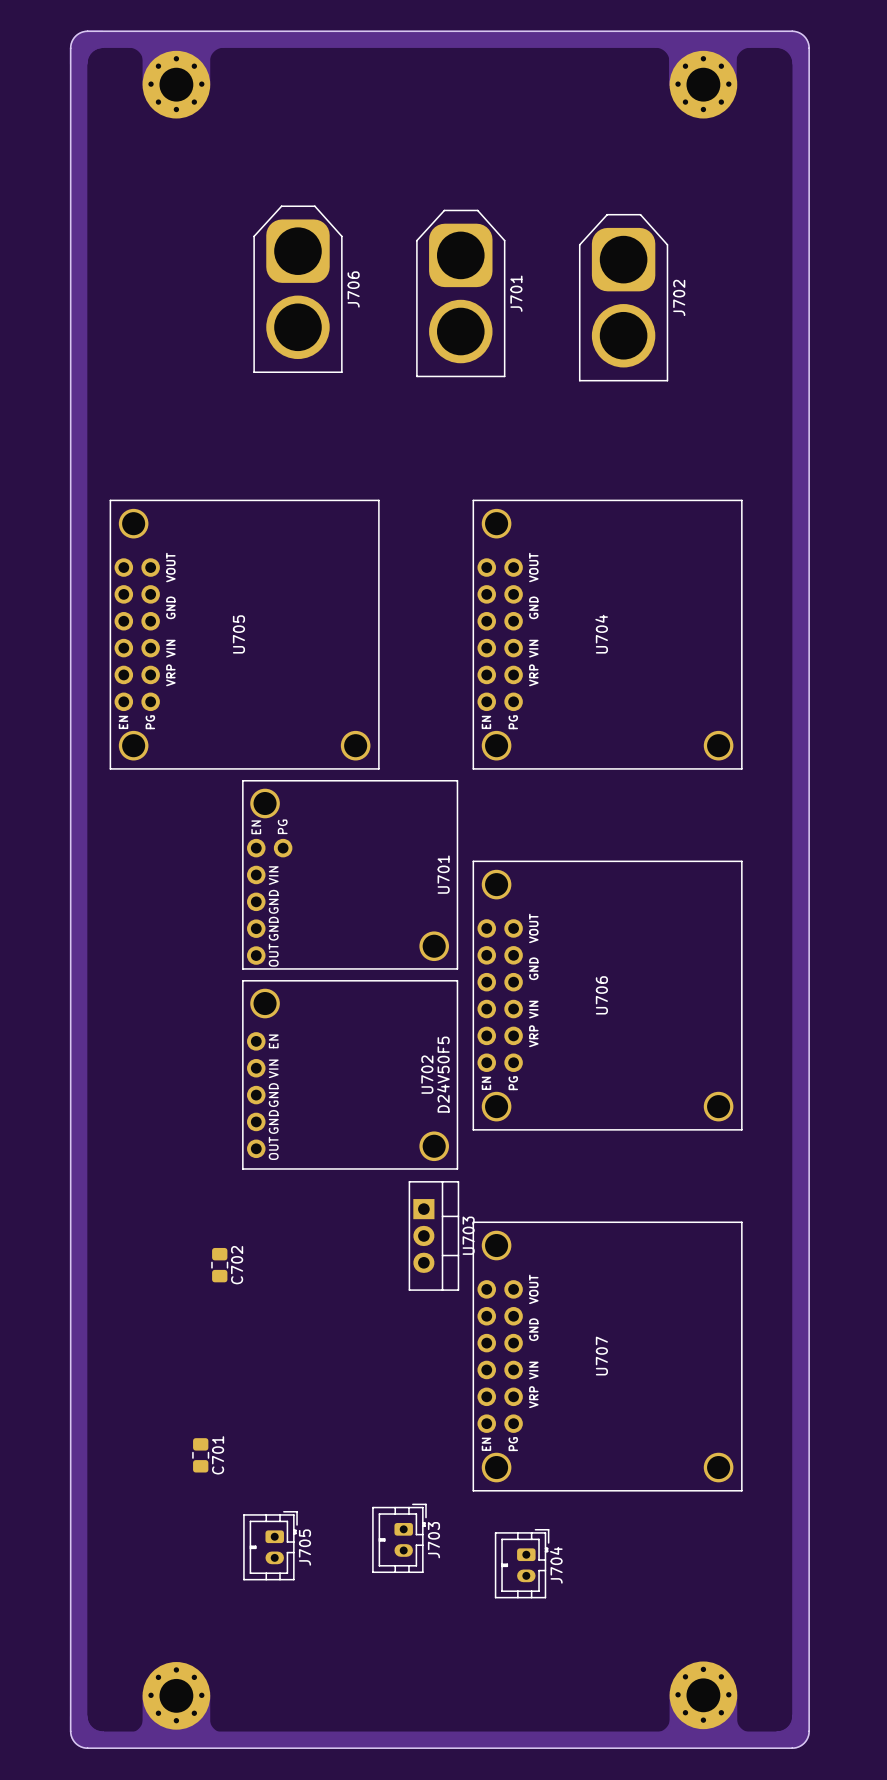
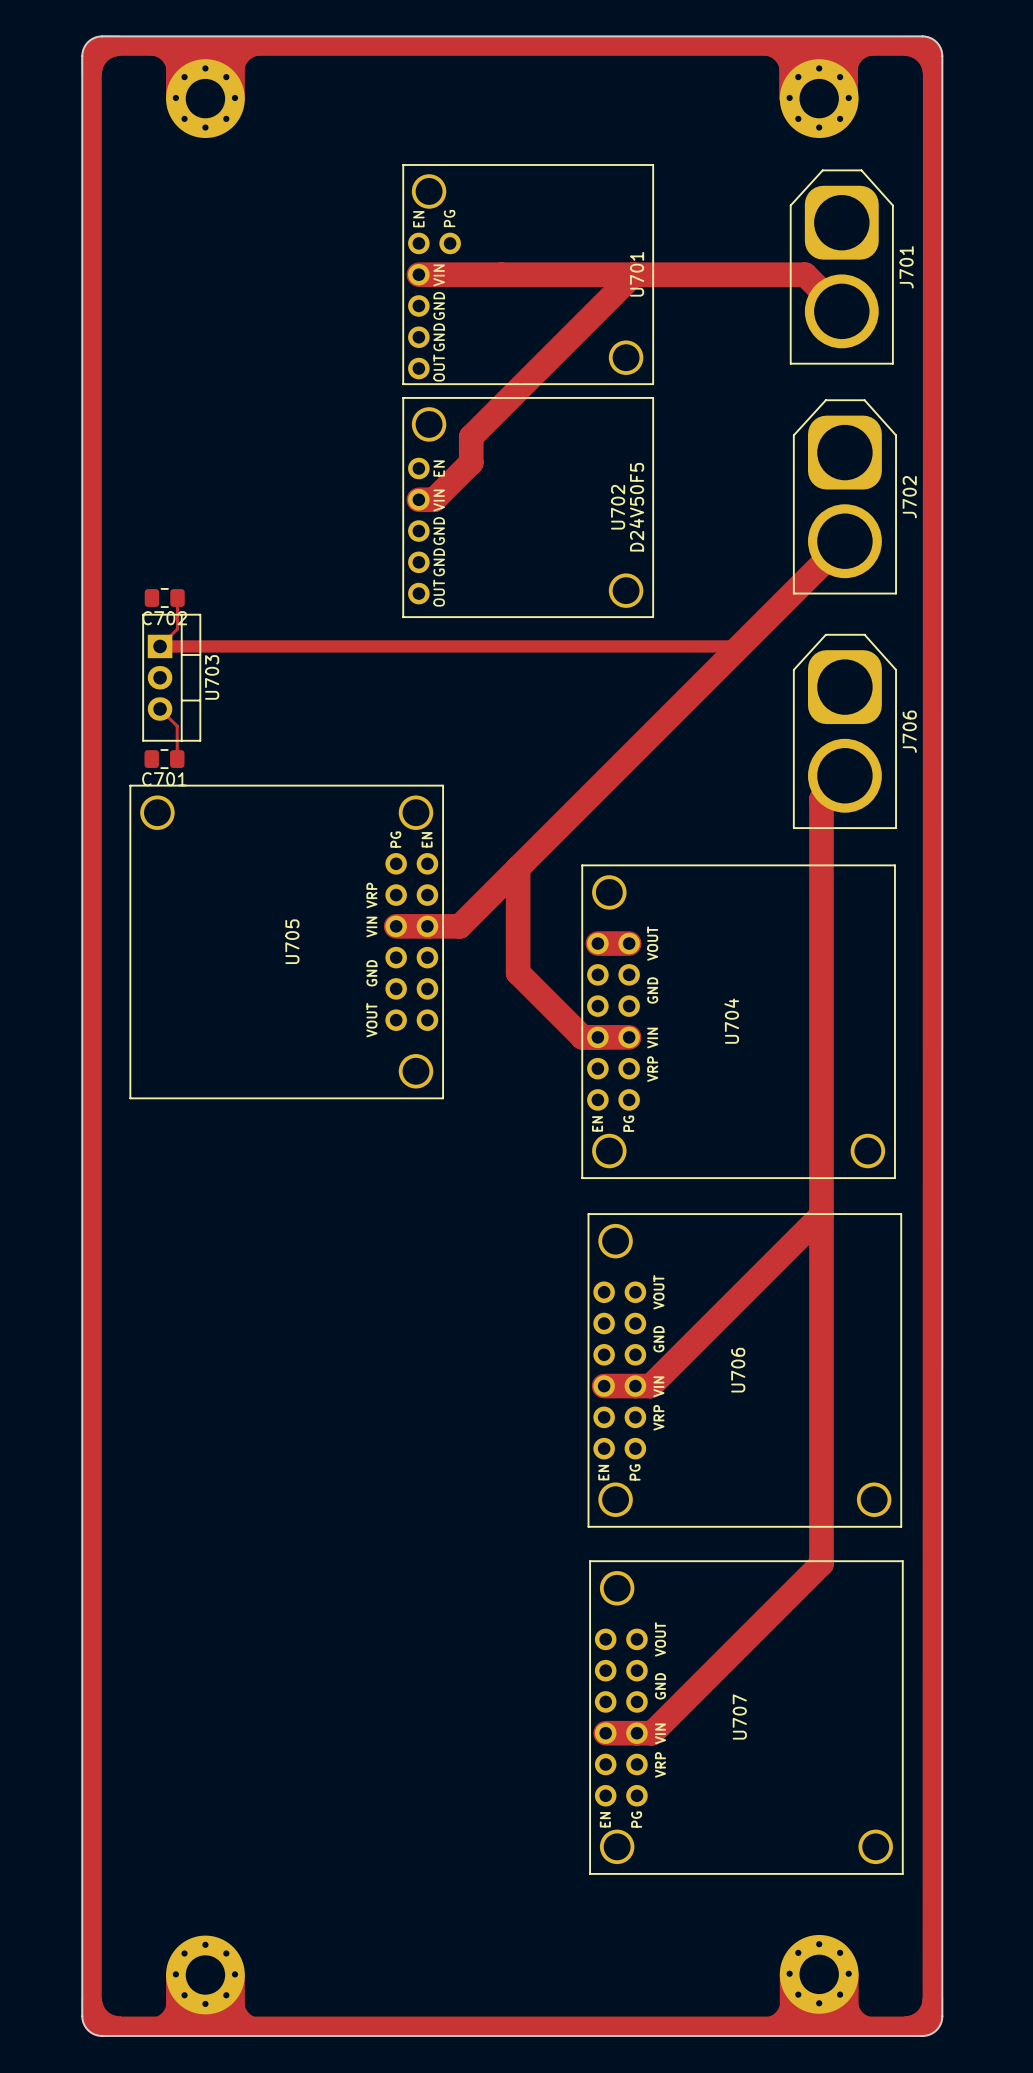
track: none -> (418, 274) (805, 274) (841, 311)
track: none -> (633, 274) (471, 436) (471, 462) (434, 499) (418, 499)
J706 position: (297, 289) -> (844, 731)
J701 position: (460, 293) -> (841, 267)
J702 position: (623, 297) -> (844, 496)
track: none -> (177, 597) (177, 628) (160, 646) (739, 646) (844, 541) (459, 926) (396, 926)
U705 rotation: 0° (284, 594) -> 180° (239, 988)
U705 position: (284, 594) -> (239, 988)
U704 position: (647, 594) -> (785, 974)
track: none -> (160, 709) (177, 726) (177, 759)
track: none -> (844, 775) (821, 799) (821, 1563) (652, 1733) (605, 1733)
track: none -> (518, 868) (518, 972) (582, 1037) (629, 1037)
track: none -> (597, 943) (629, 943)
U701 position: (350, 874) -> (528, 274)
U706 position: (647, 955) -> (791, 1323)
track: none -> (821, 1215) (650, 1386) (604, 1386)
U702 position: (350, 1074) -> (528, 507)
U703 position: (433, 1235) -> (171, 677)
C702 rotation: 0° (219, 1265) -> 90° clockwise (164, 597)
C702 position: (219, 1265) -> (164, 597)
U707 position: (647, 1316) -> (793, 1670)
C701 rotation: 0° (200, 1455) -> 90° clockwise (164, 759)
C701 position: (200, 1455) -> (164, 759)
J703: (399, 1538) -> none
J705: (270, 1545) -> none
J704: (522, 1563) -> none

